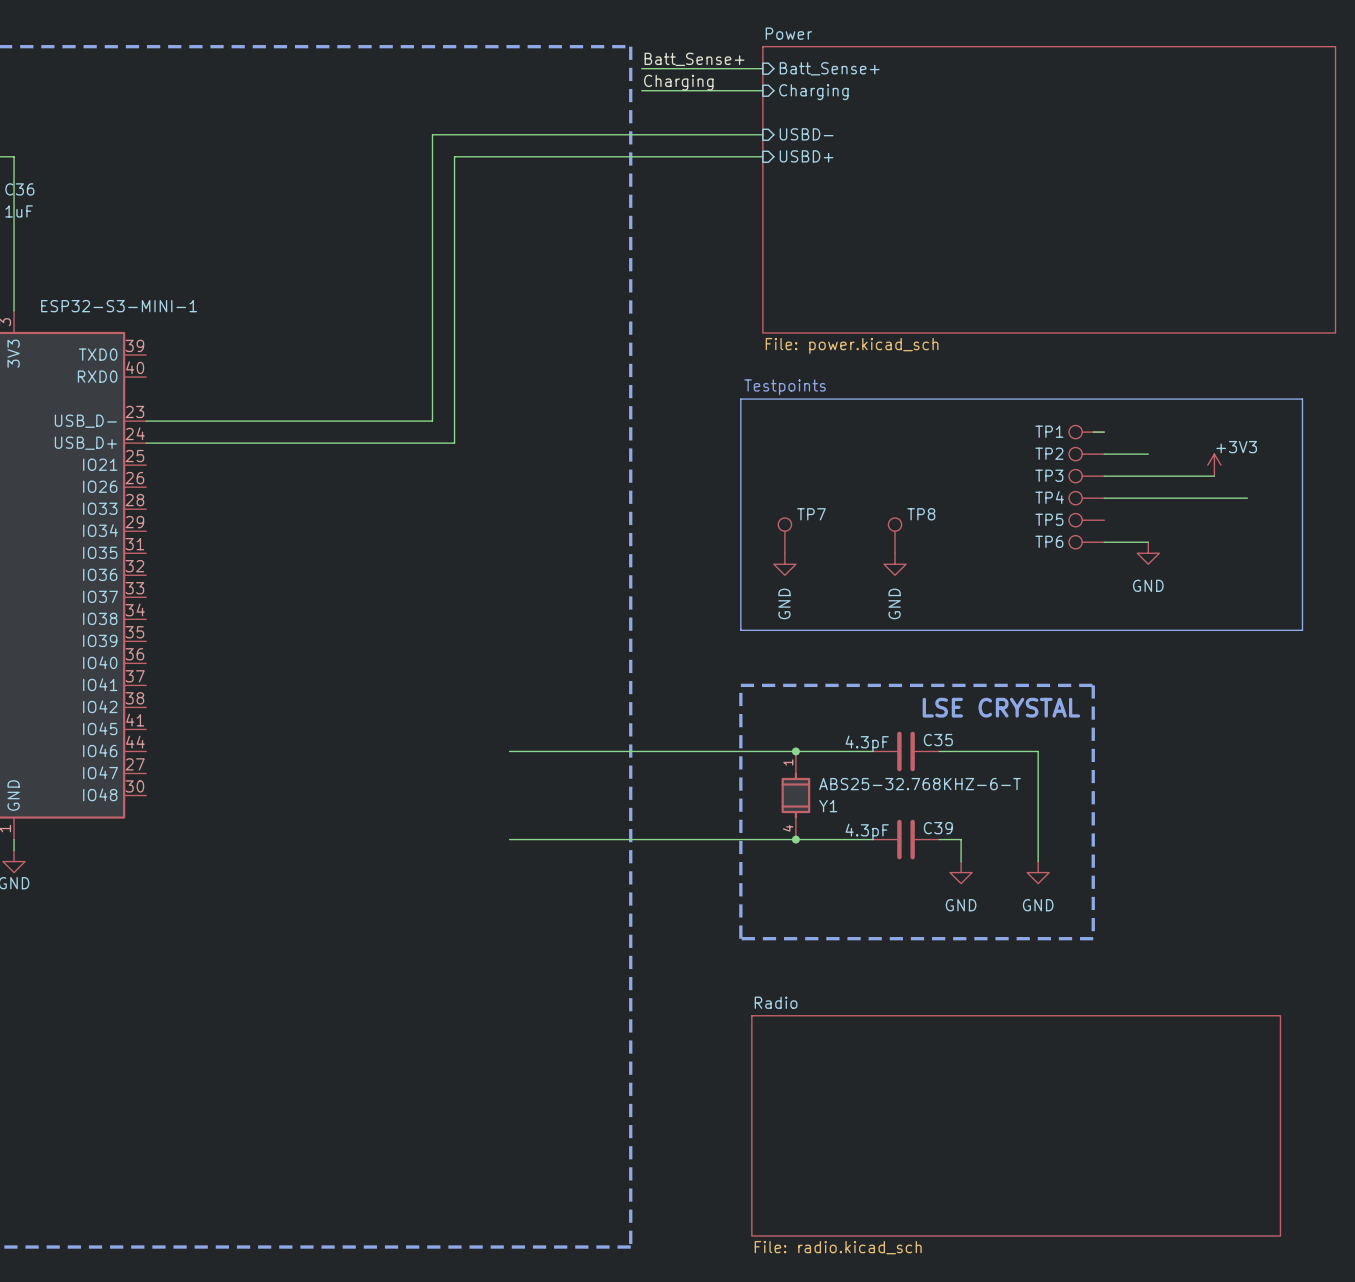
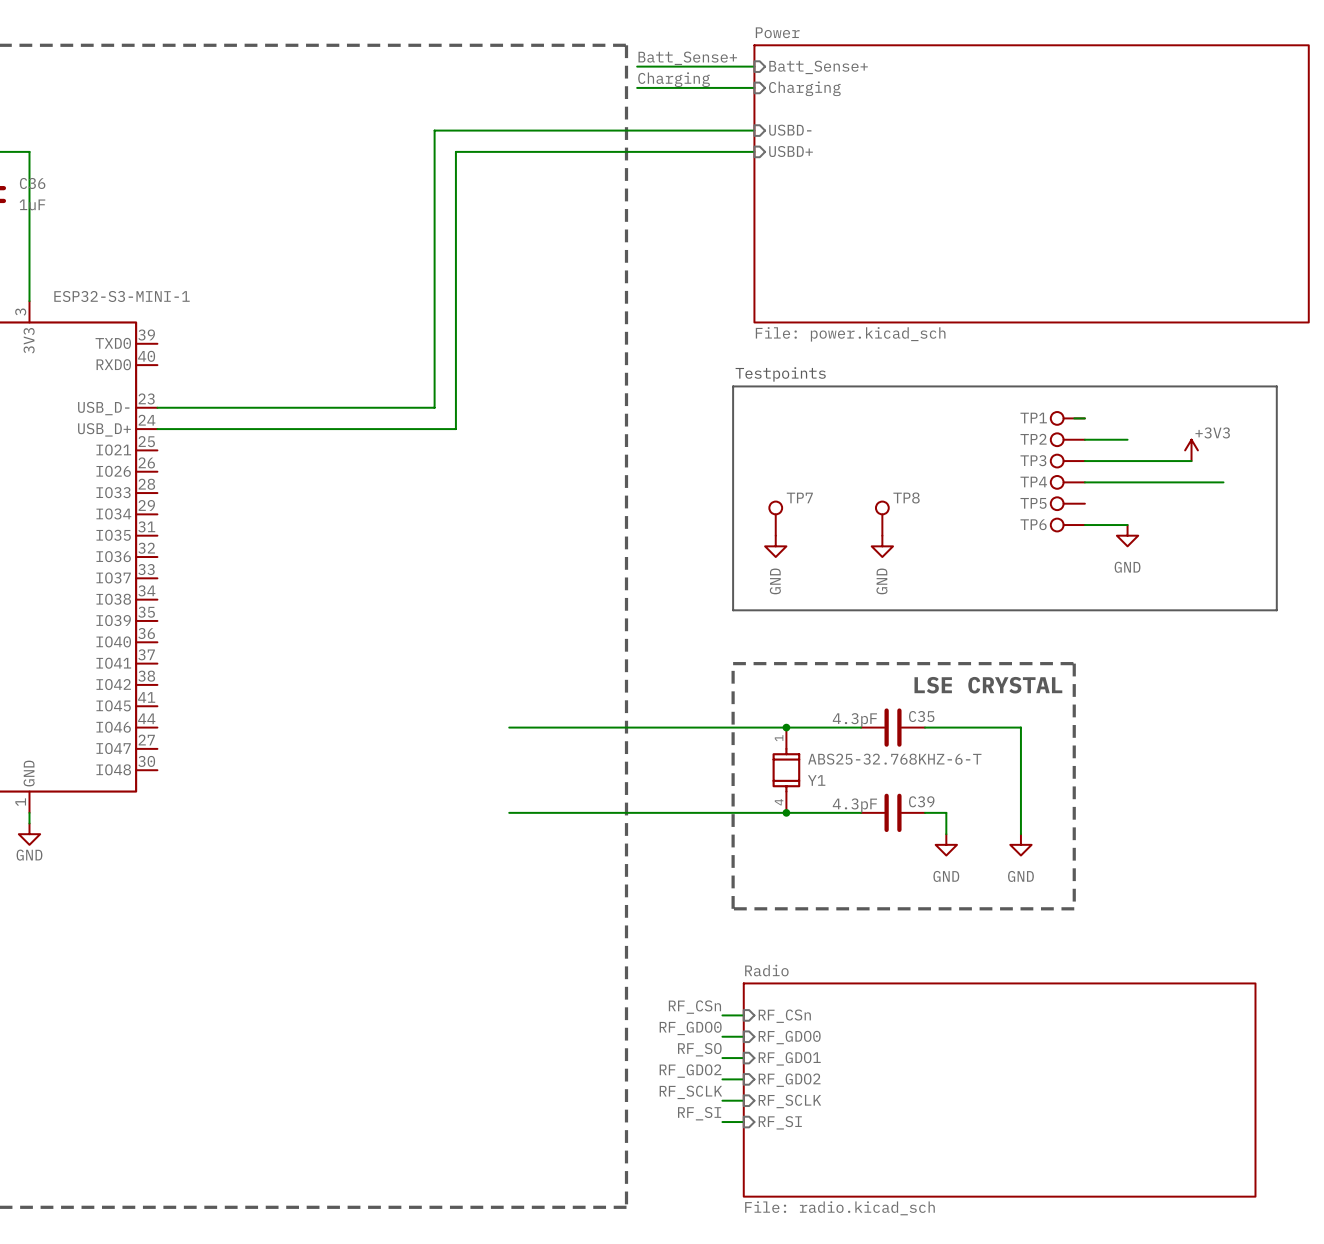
label: none -> RF_CSn (694, 1007)
wire: none -> (722, 1015) (743, 1015)
sheet pin: none -> RF_CSn (784, 1016)
label: none -> RF_GDO0 (690, 1028)
wire: none -> (722, 1036) (743, 1036)
sheet pin: none -> RF_GDO0 (789, 1037)
label: none -> RF_SO (699, 1049)
wire: none -> (722, 1058) (743, 1058)
sheet pin: none -> RF_GDO1 (789, 1058)
label: none -> RF_GDO2 (690, 1071)
wire: none -> (722, 1079) (743, 1079)
sheet pin: none -> RF_GDO2 (789, 1080)
label: none -> RF_SCLK (690, 1092)
wire: none -> (722, 1100) (743, 1100)
sheet pin: none -> RF_SCLK (789, 1101)
label: none -> RF_SI (699, 1113)
wire: none -> (722, 1122) (743, 1122)
sheet pin: none -> RF_SI (780, 1122)

